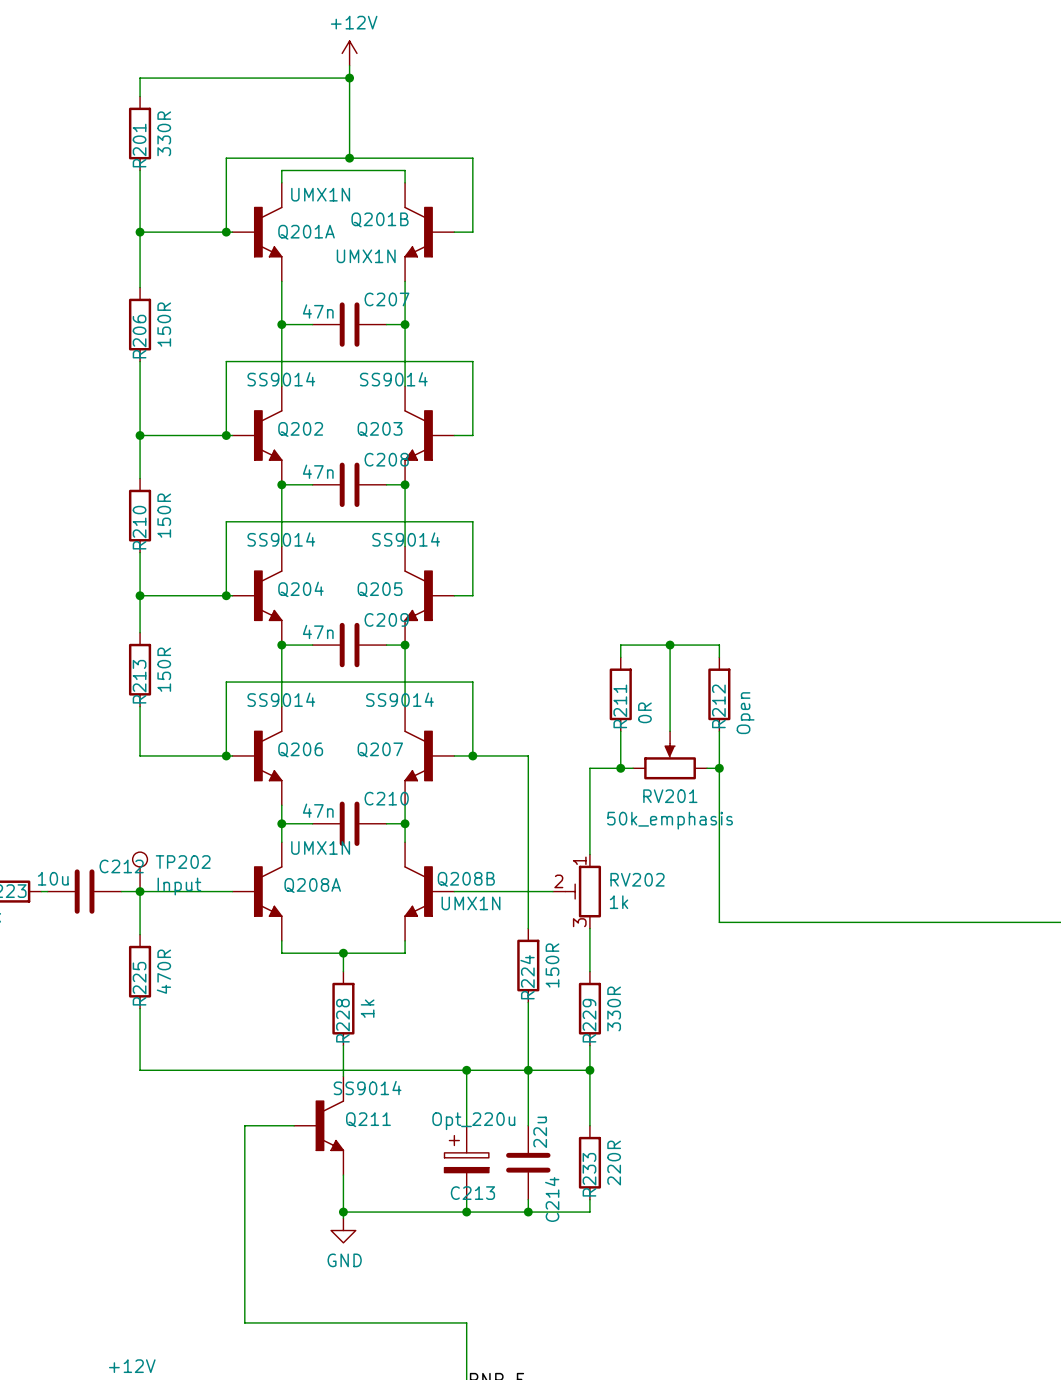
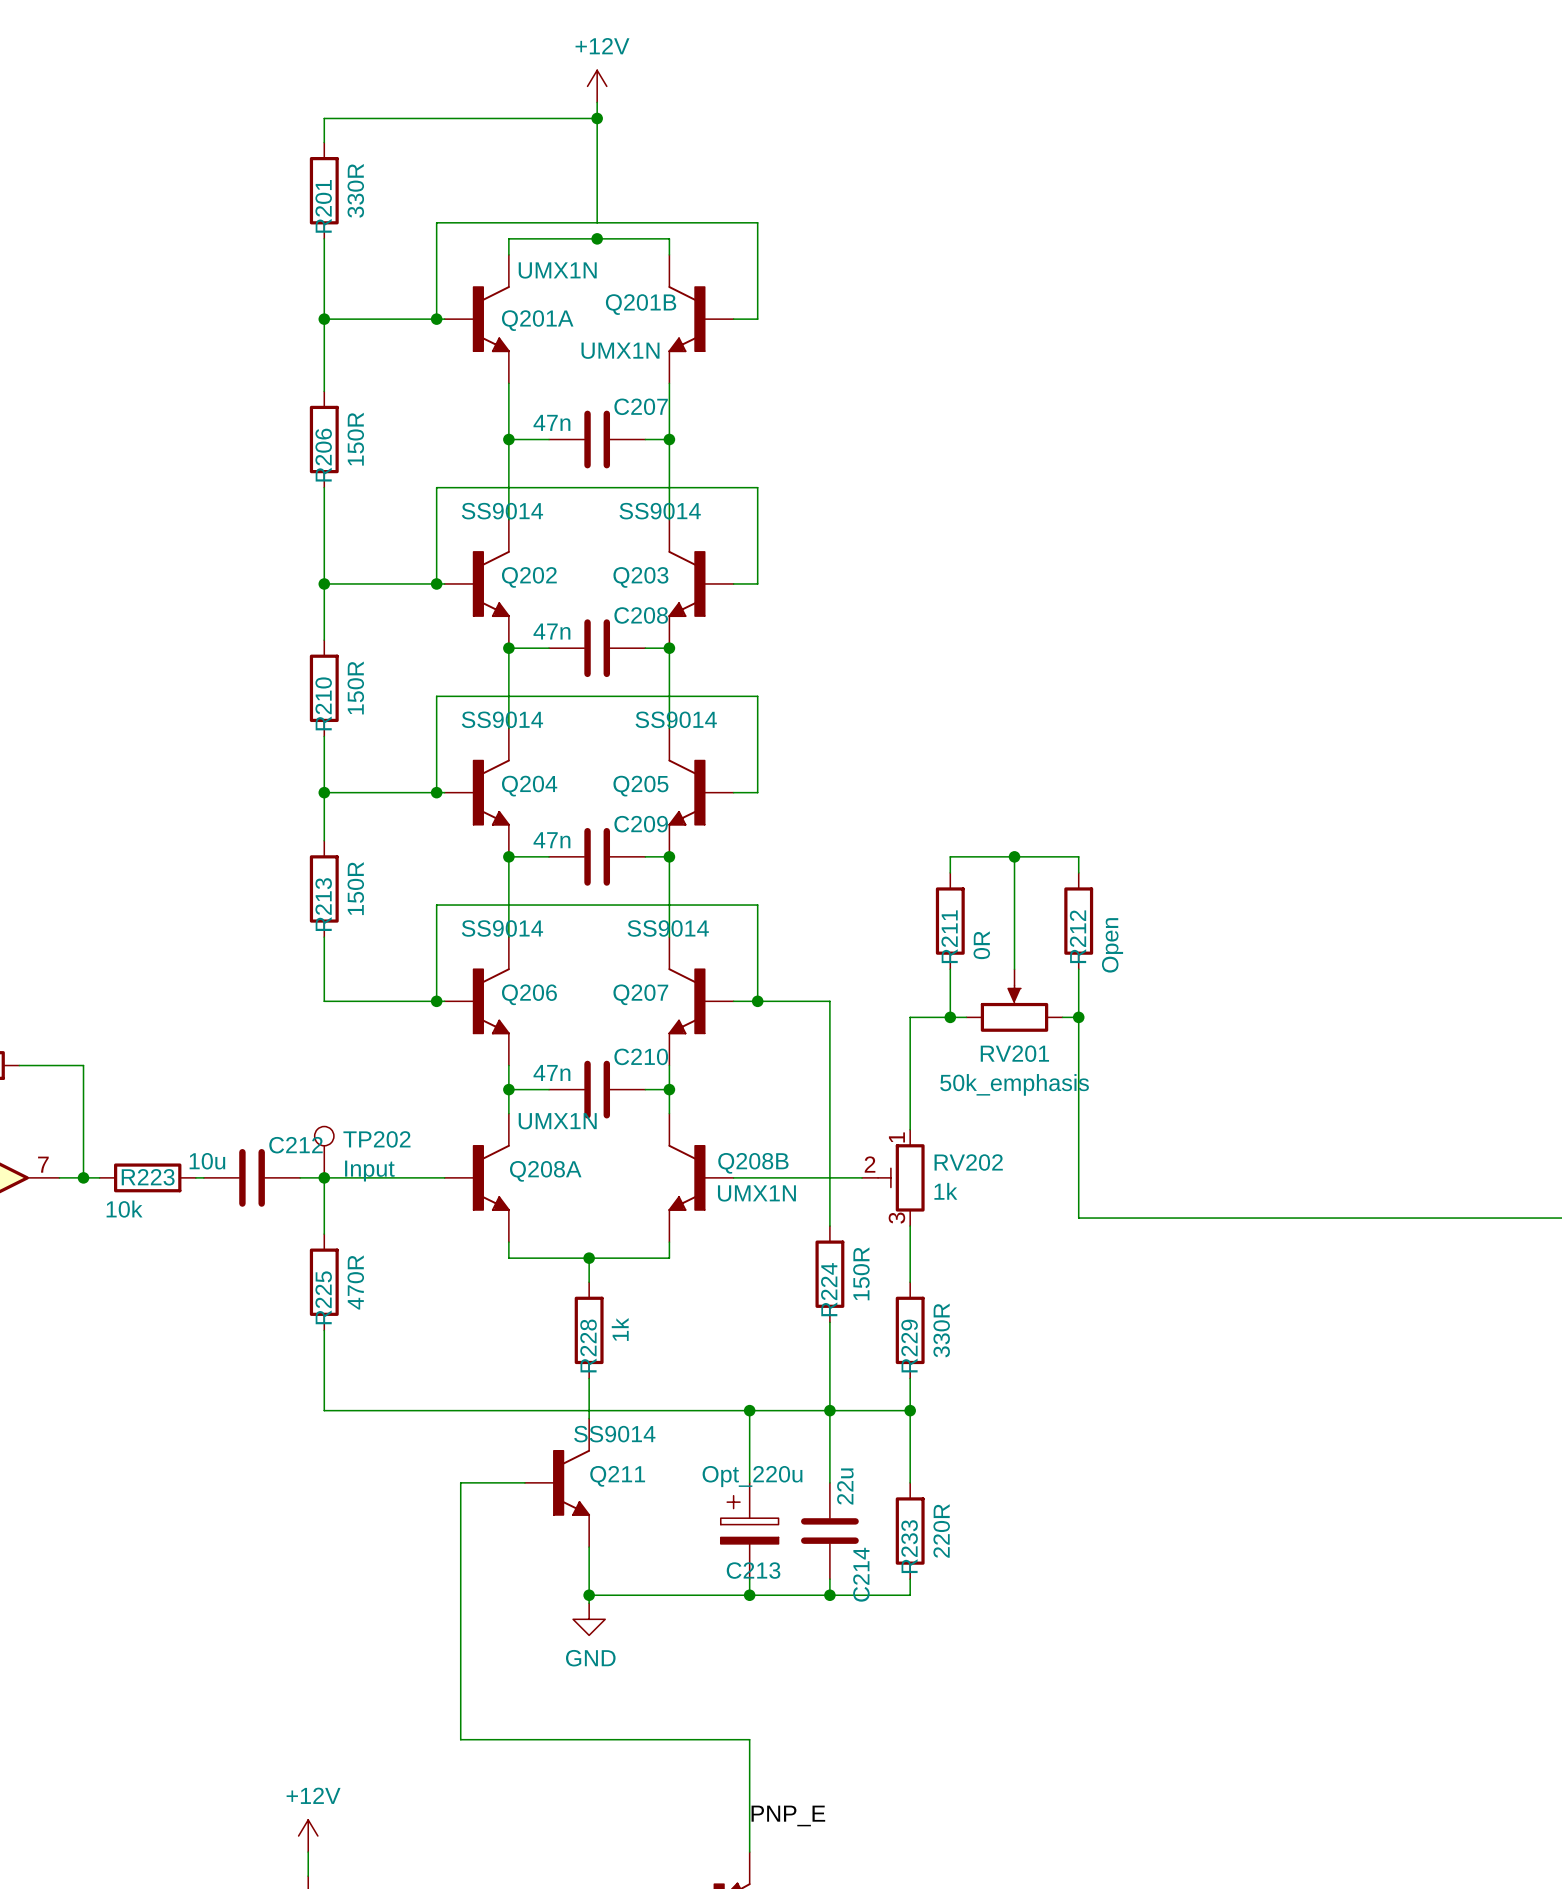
junction position: (349, 158) -> (597, 238)

